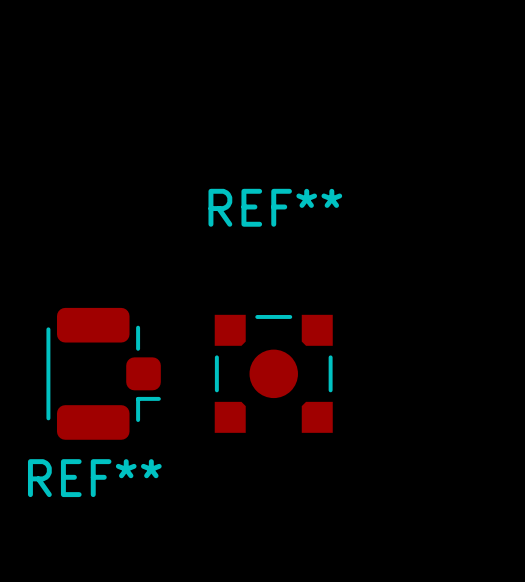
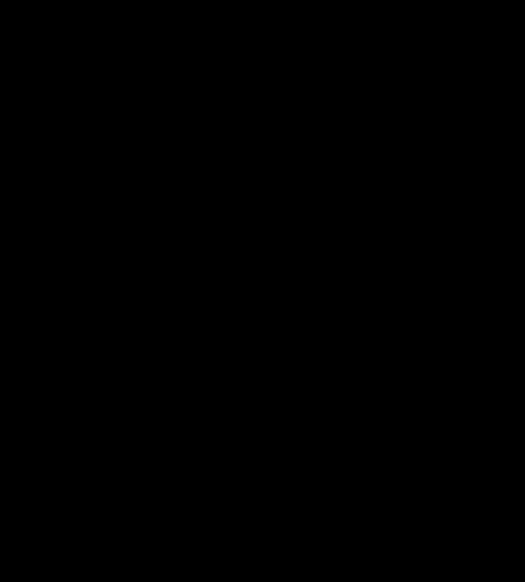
REF**: (103, 373) -> none
REF**: (273, 373) -> none

